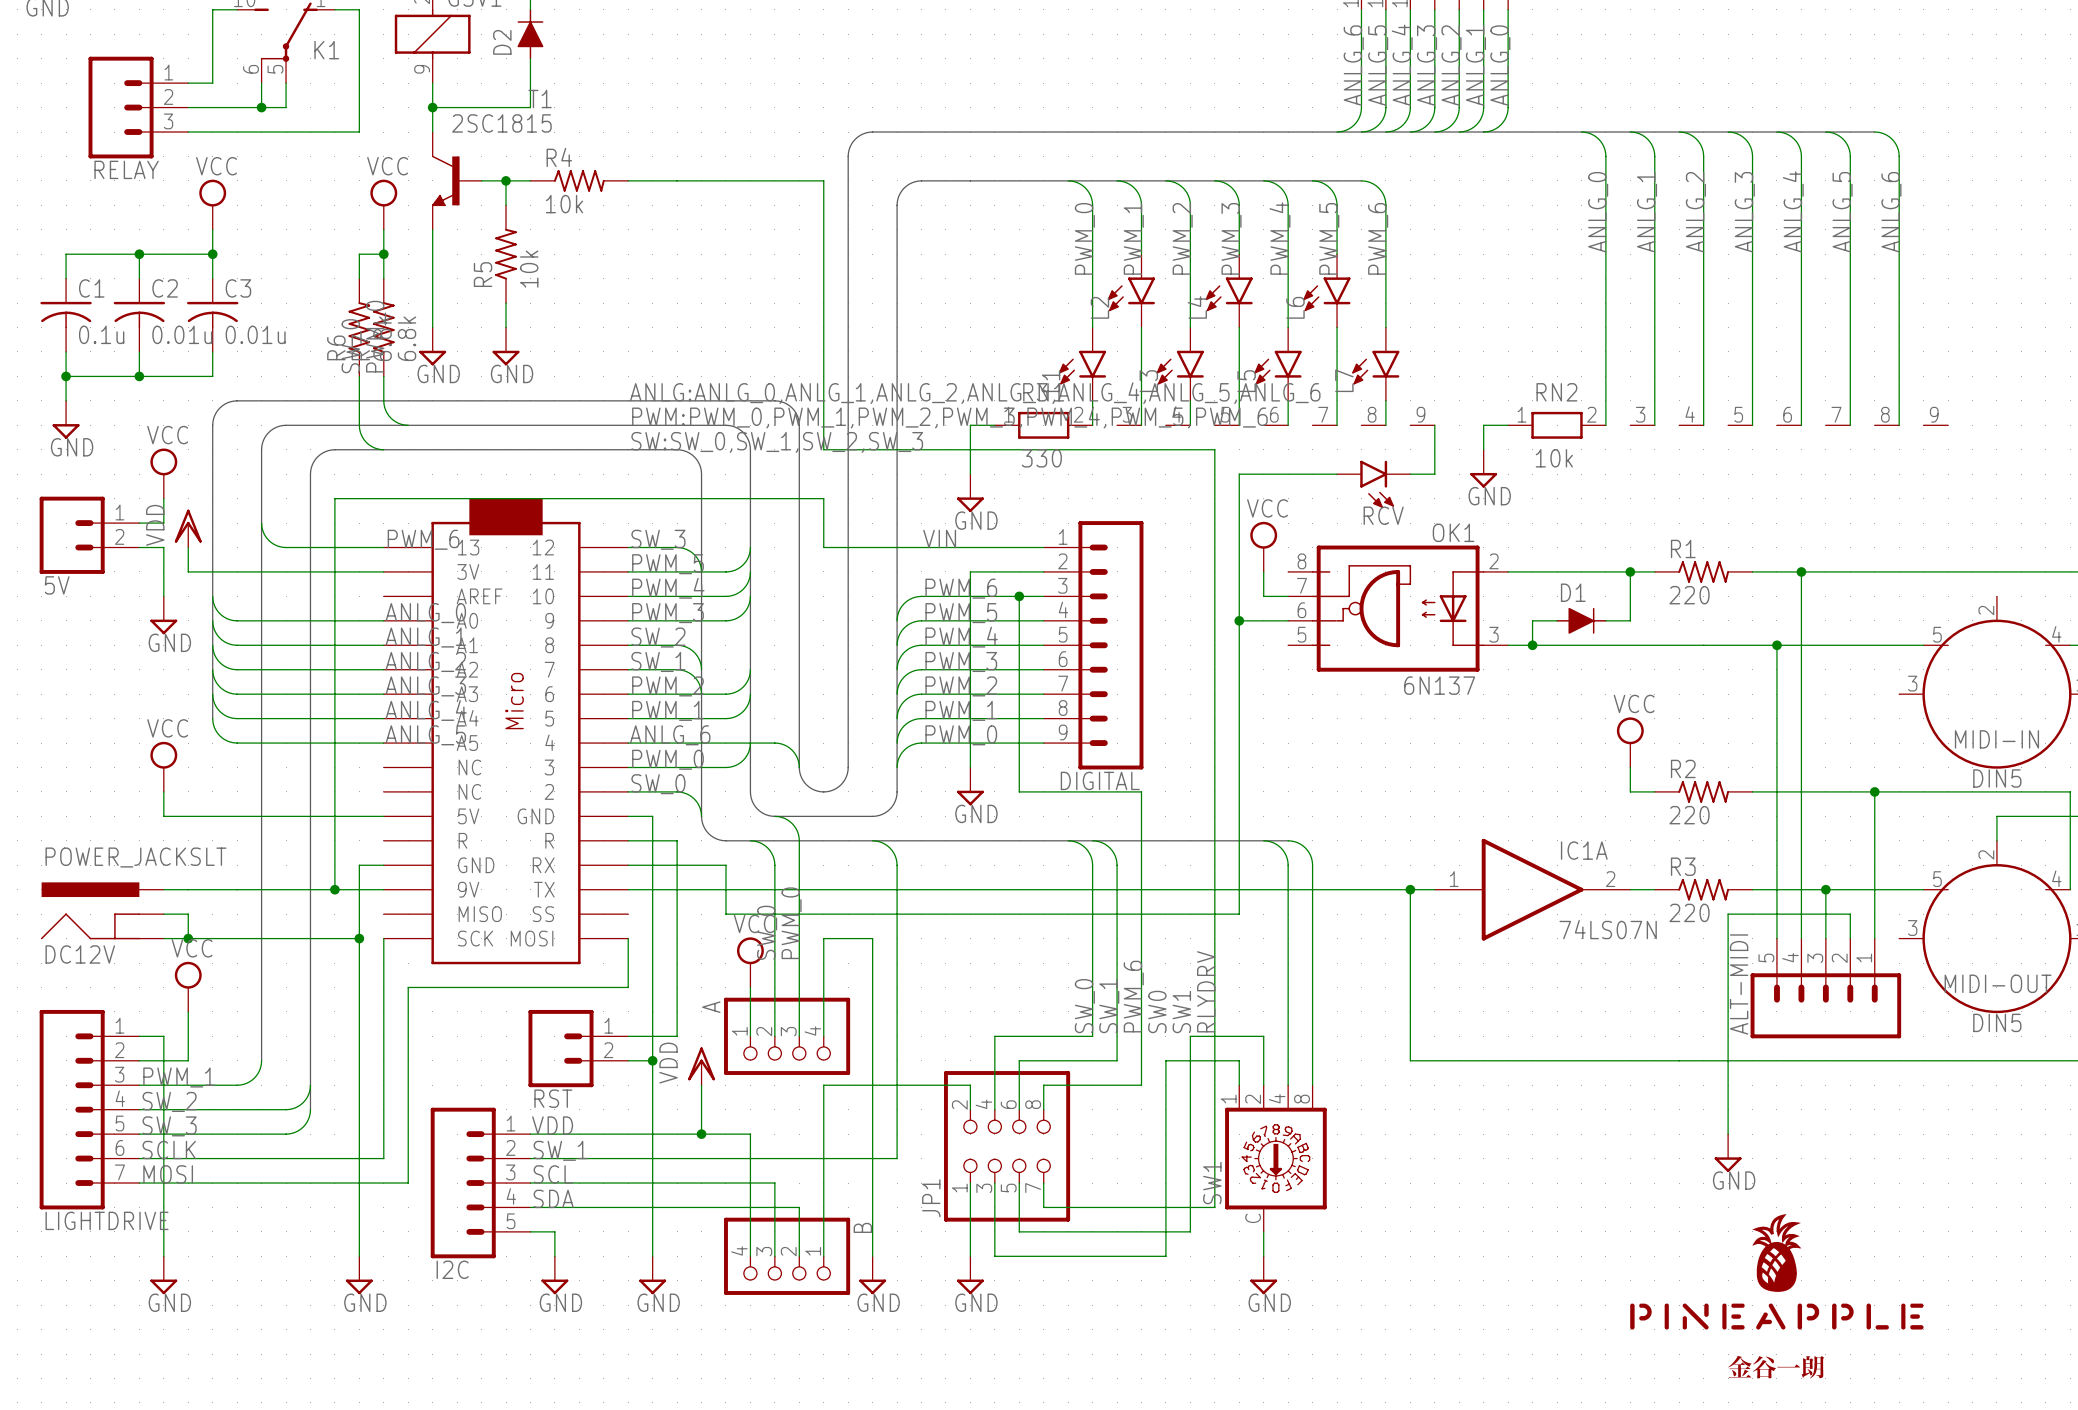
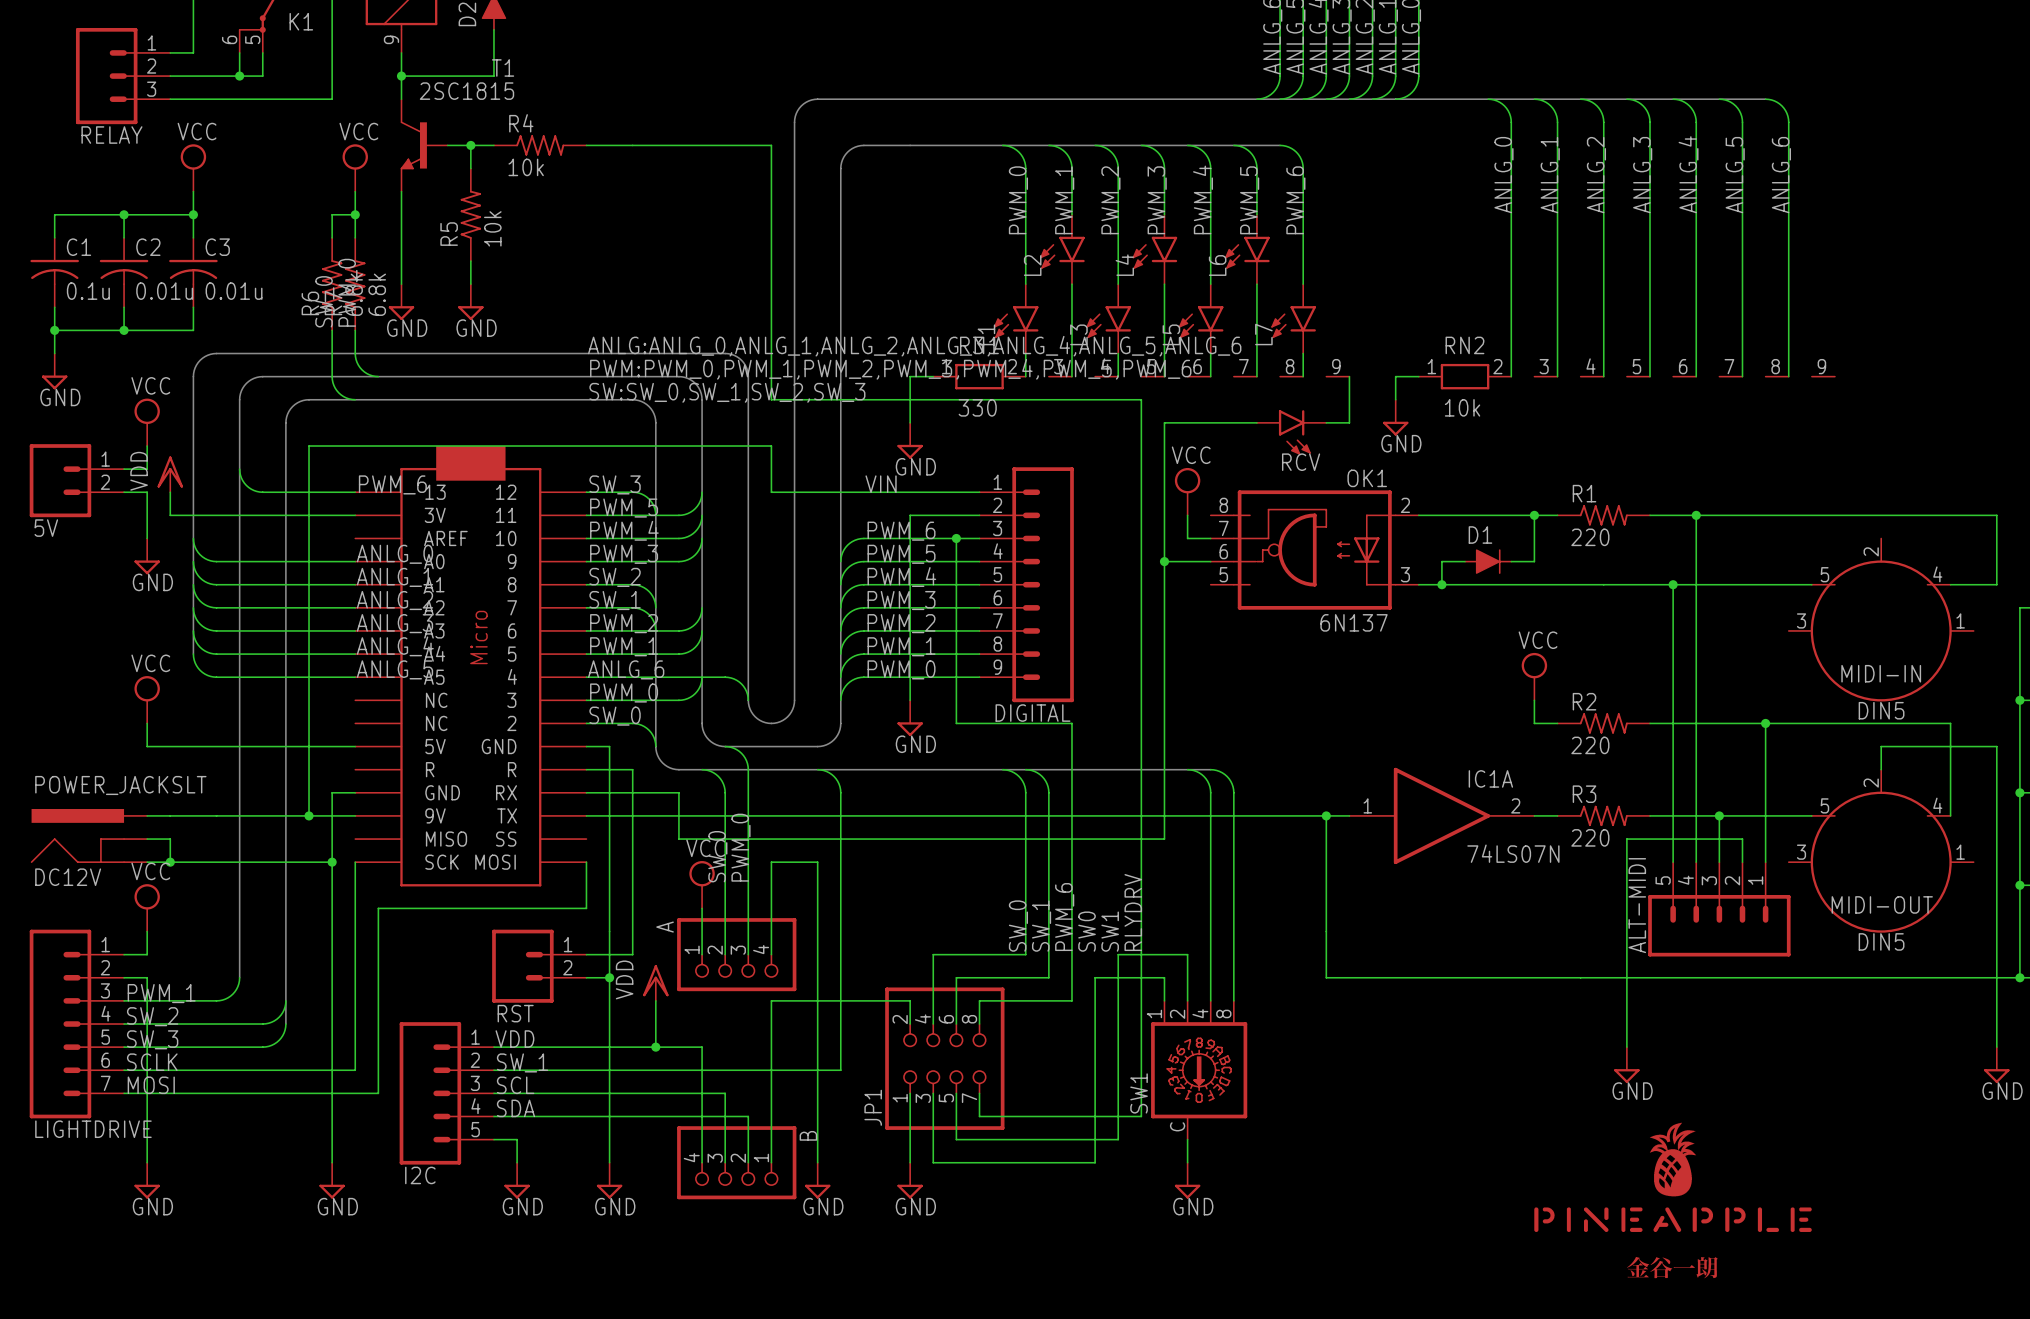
power symbol position: VCC (188, 986) -> VCC (147, 907)
wire: (188, 1011) (188, 1060) (163, 1060) (163, 1036) -> (147, 931) (147, 954)

